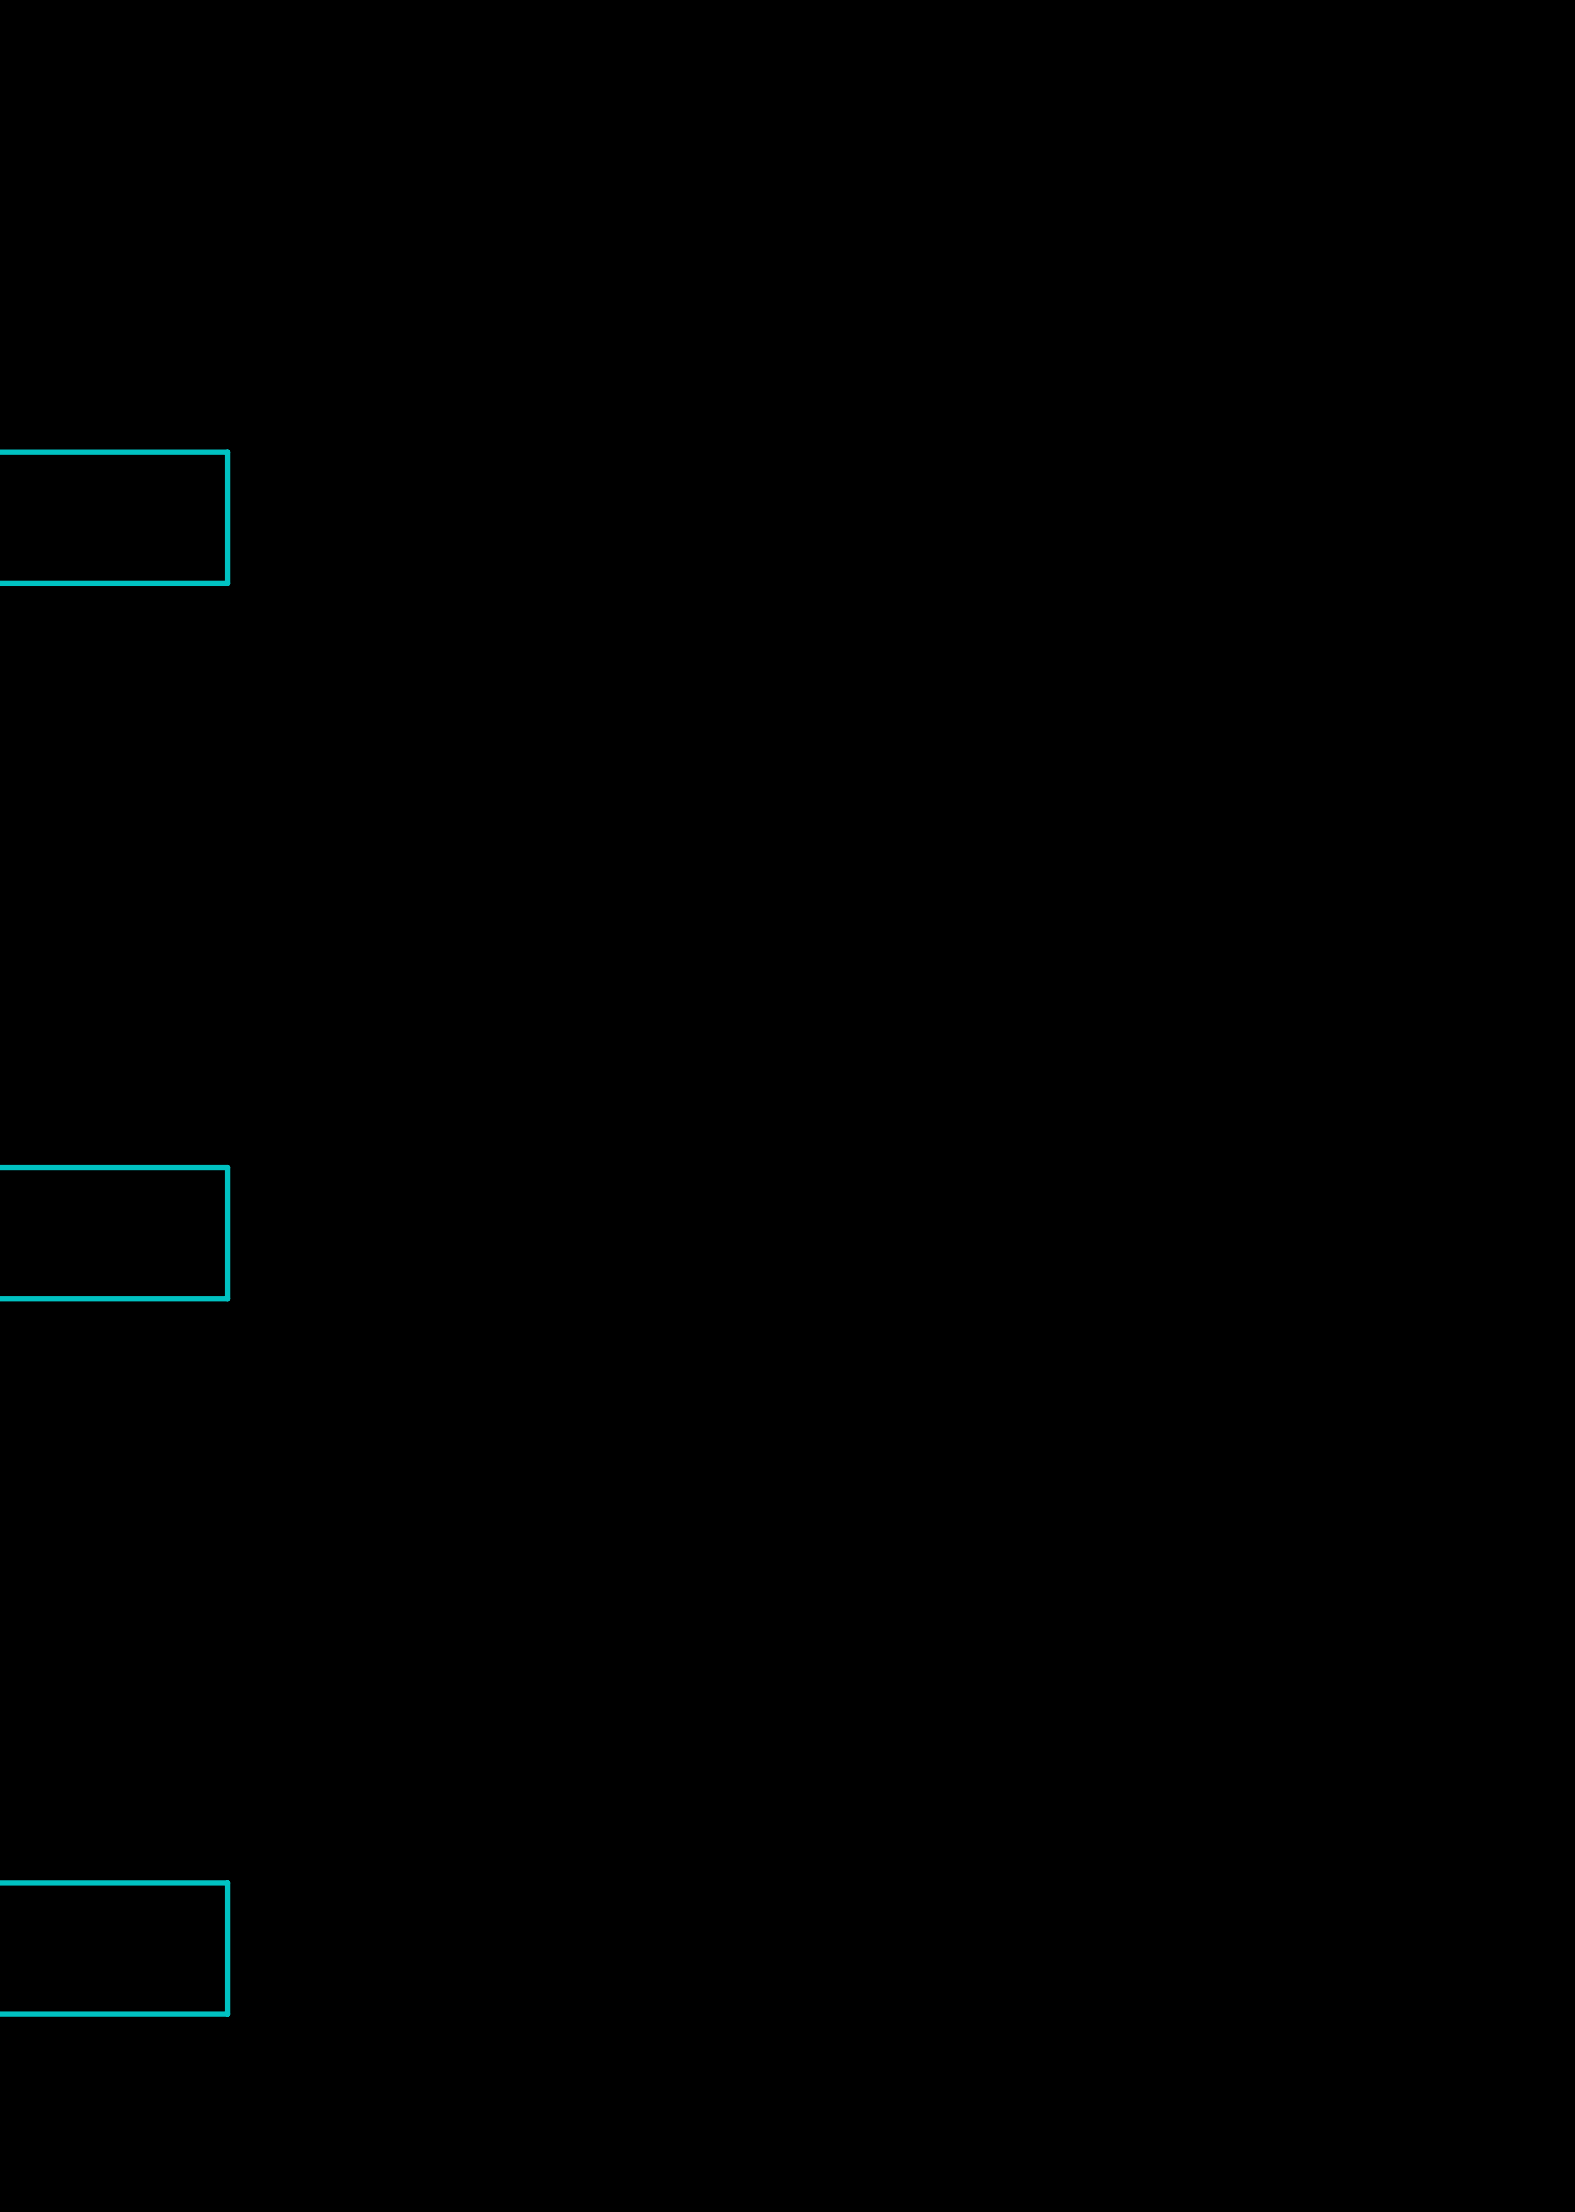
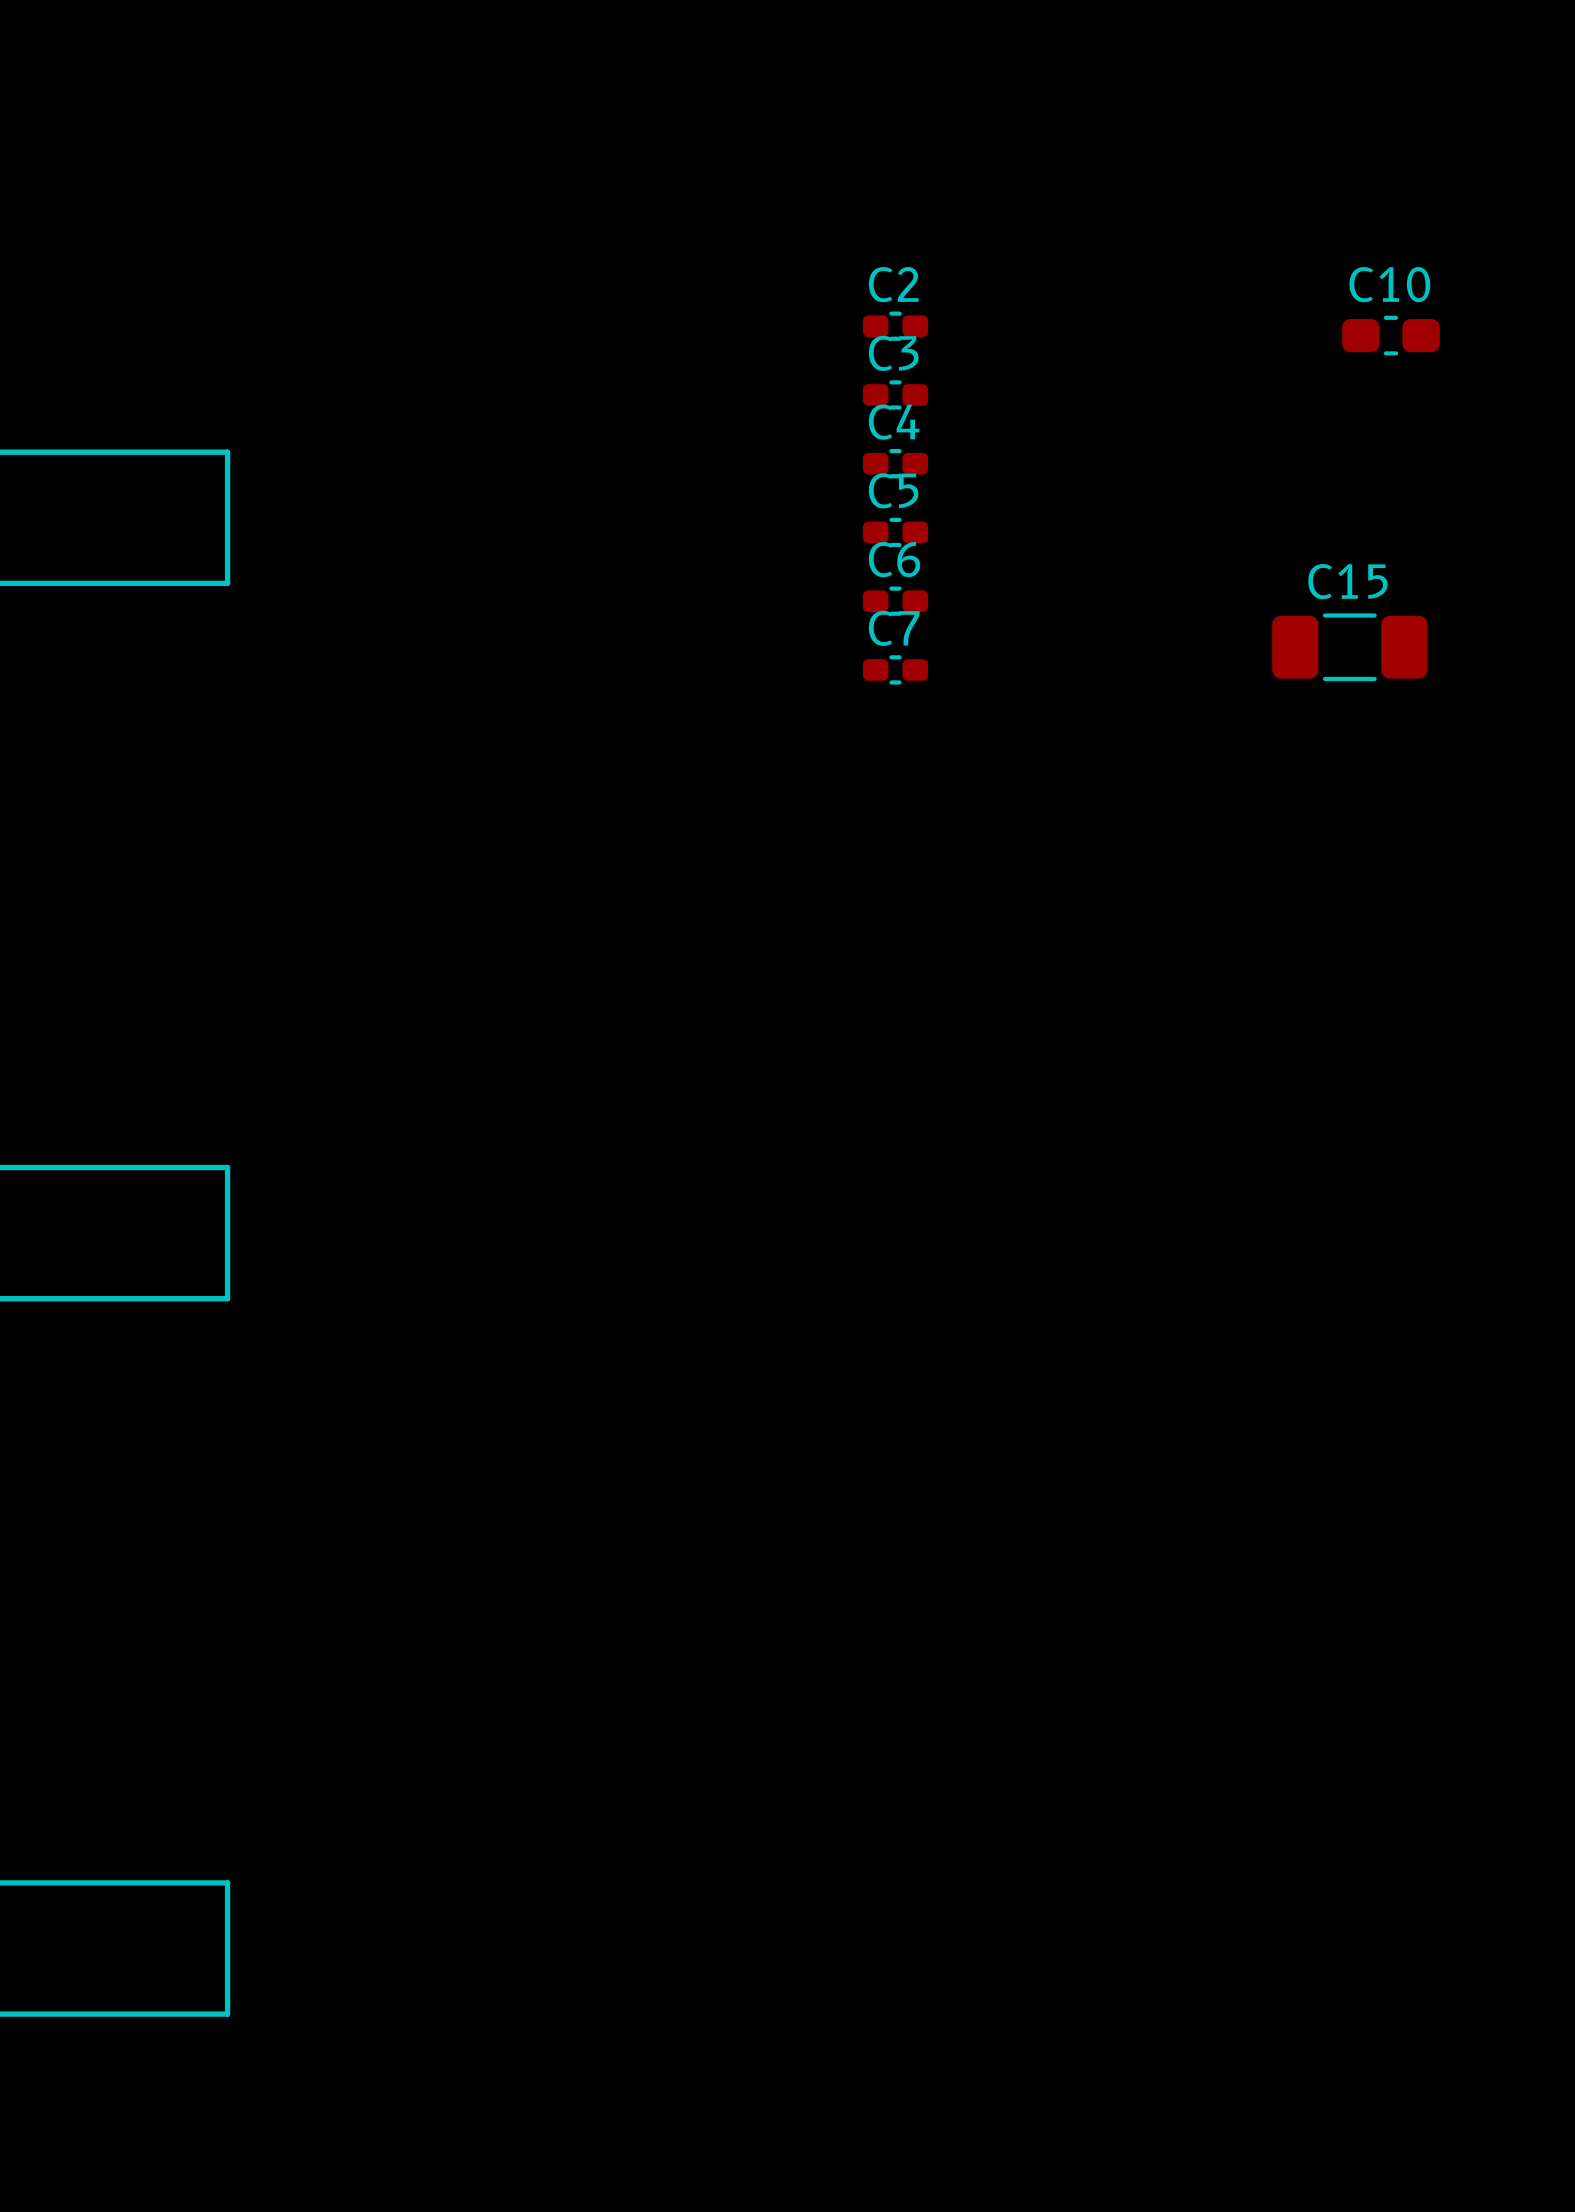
C2: none -> (895, 326)
C10: none -> (1391, 335)
C3: none -> (895, 394)
C4: none -> (895, 463)
C5: none -> (895, 532)
C6: none -> (895, 601)
C15: none -> (1349, 647)
C7: none -> (895, 669)

